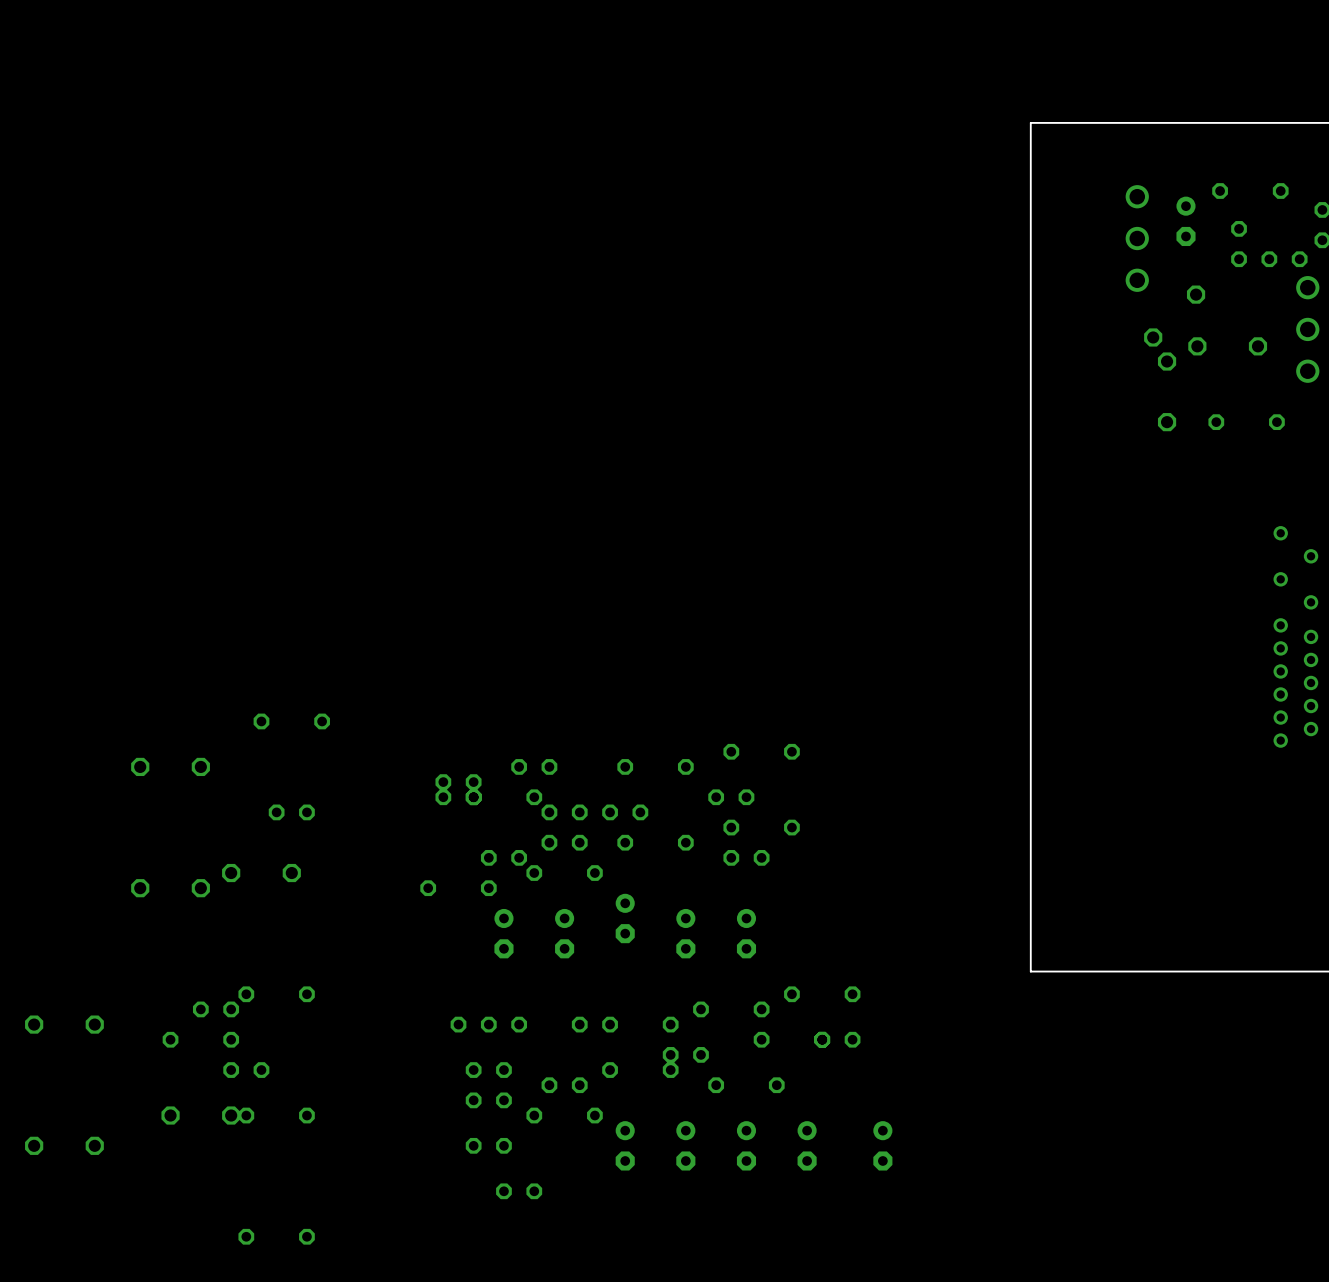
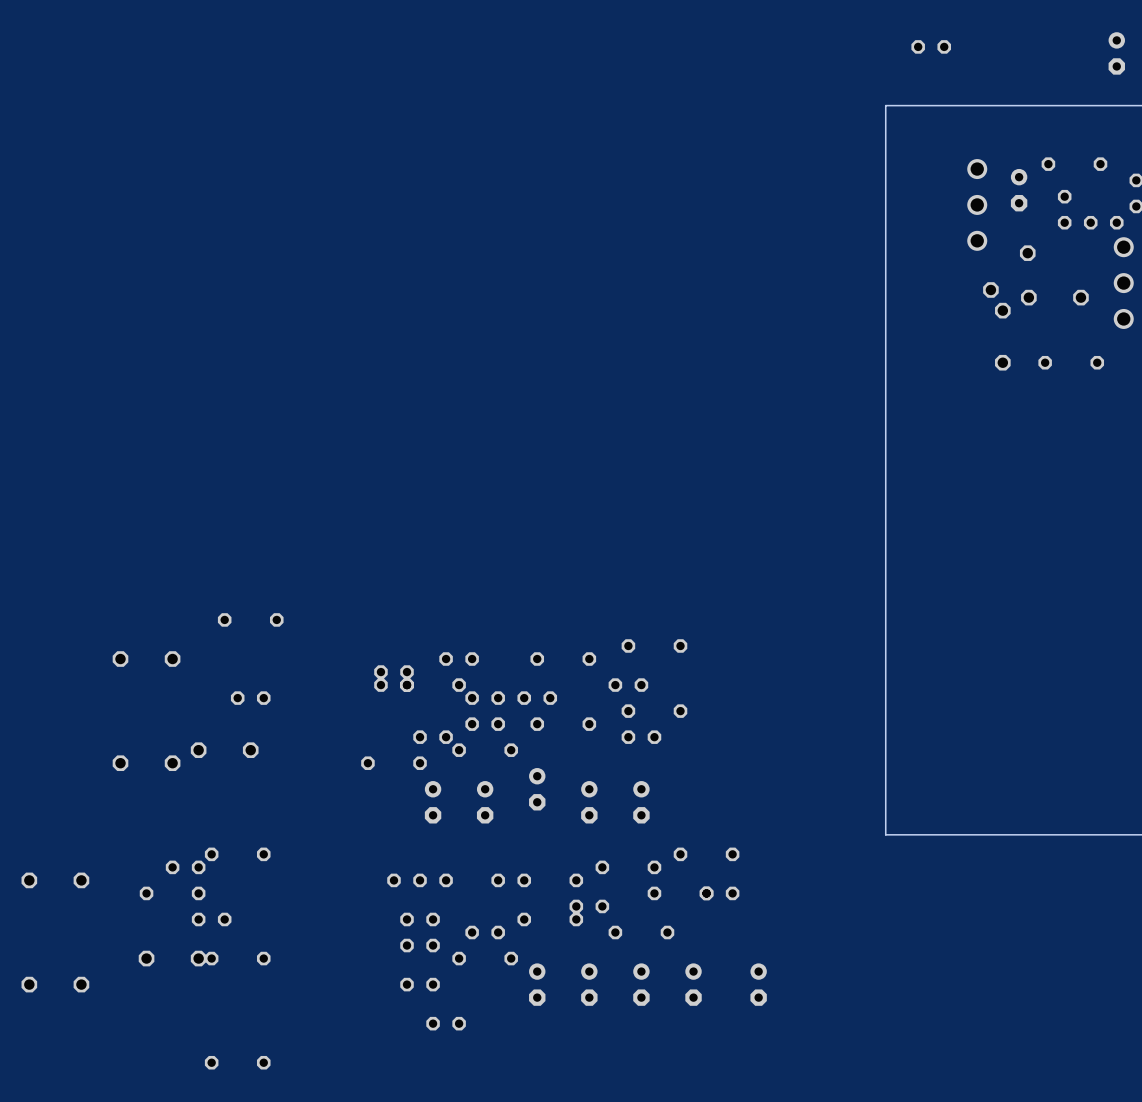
part: none -> (931, 46)
part: none -> (1116, 53)
part: (1295, 636) -> none

